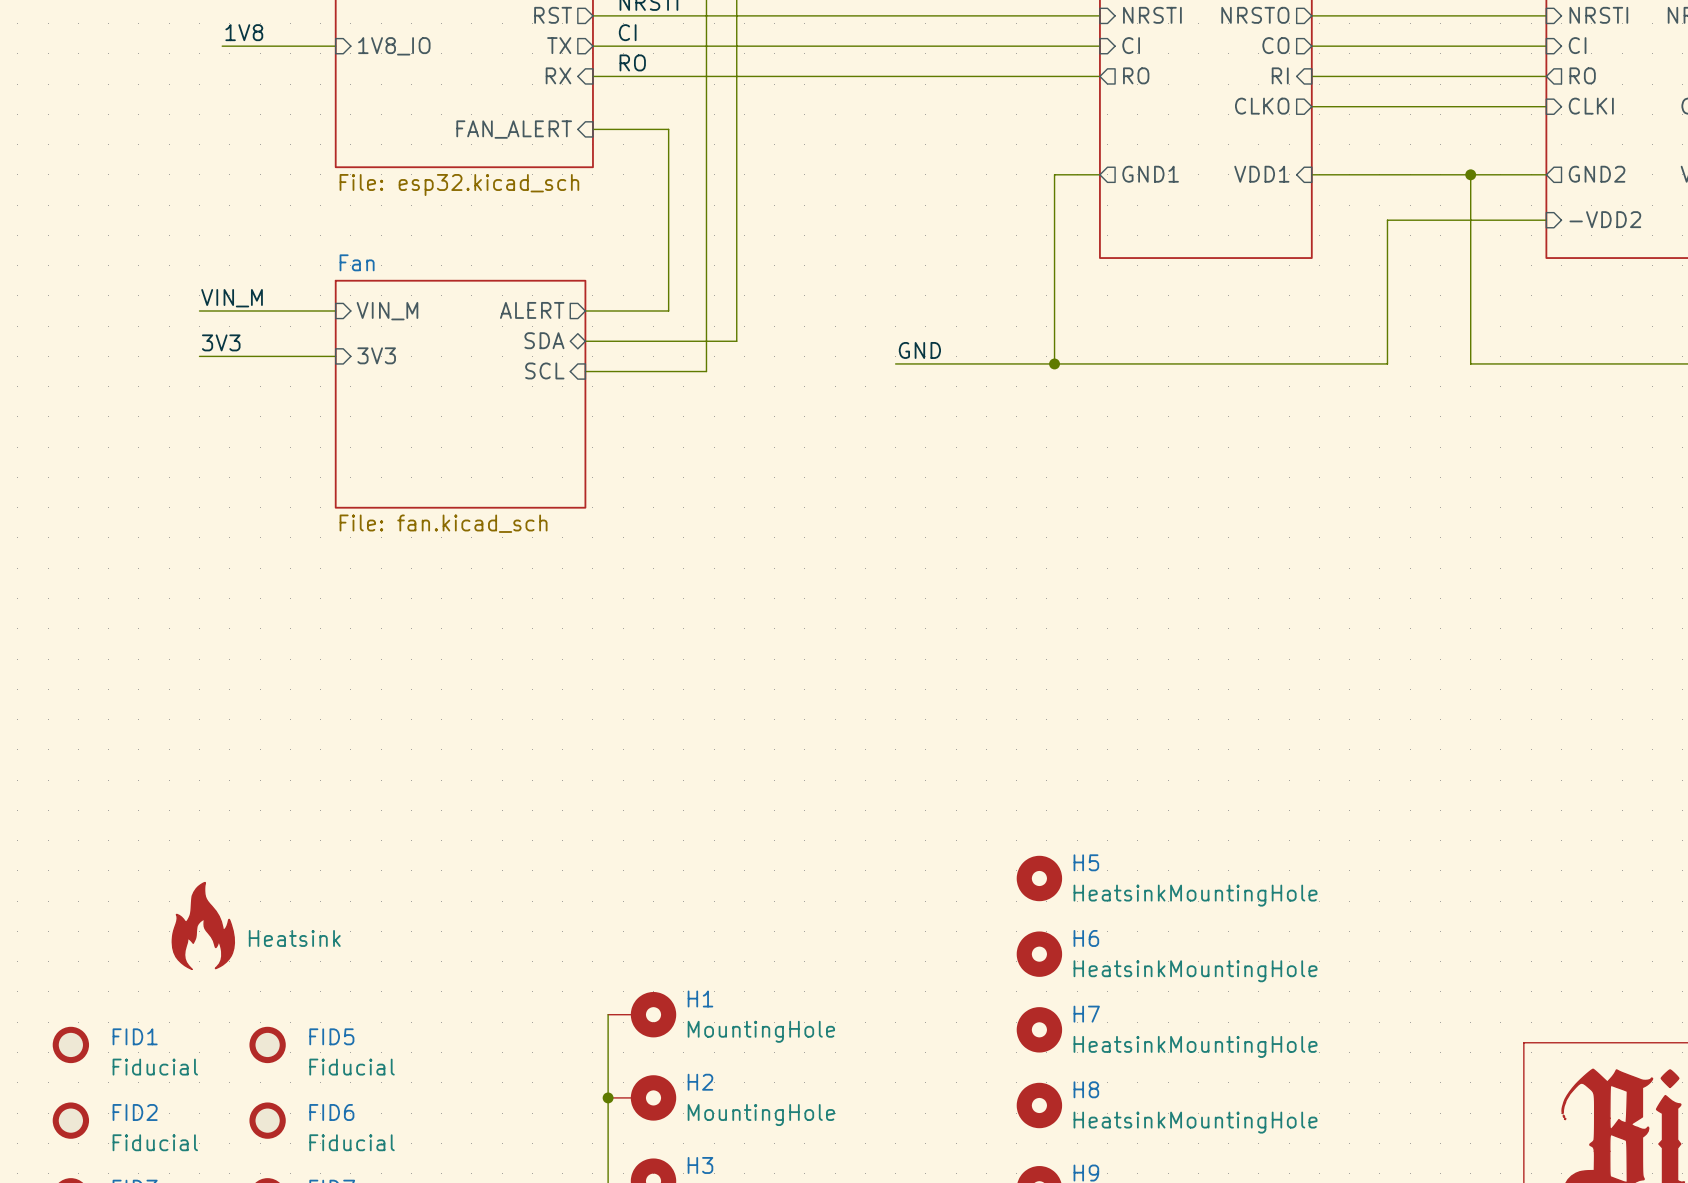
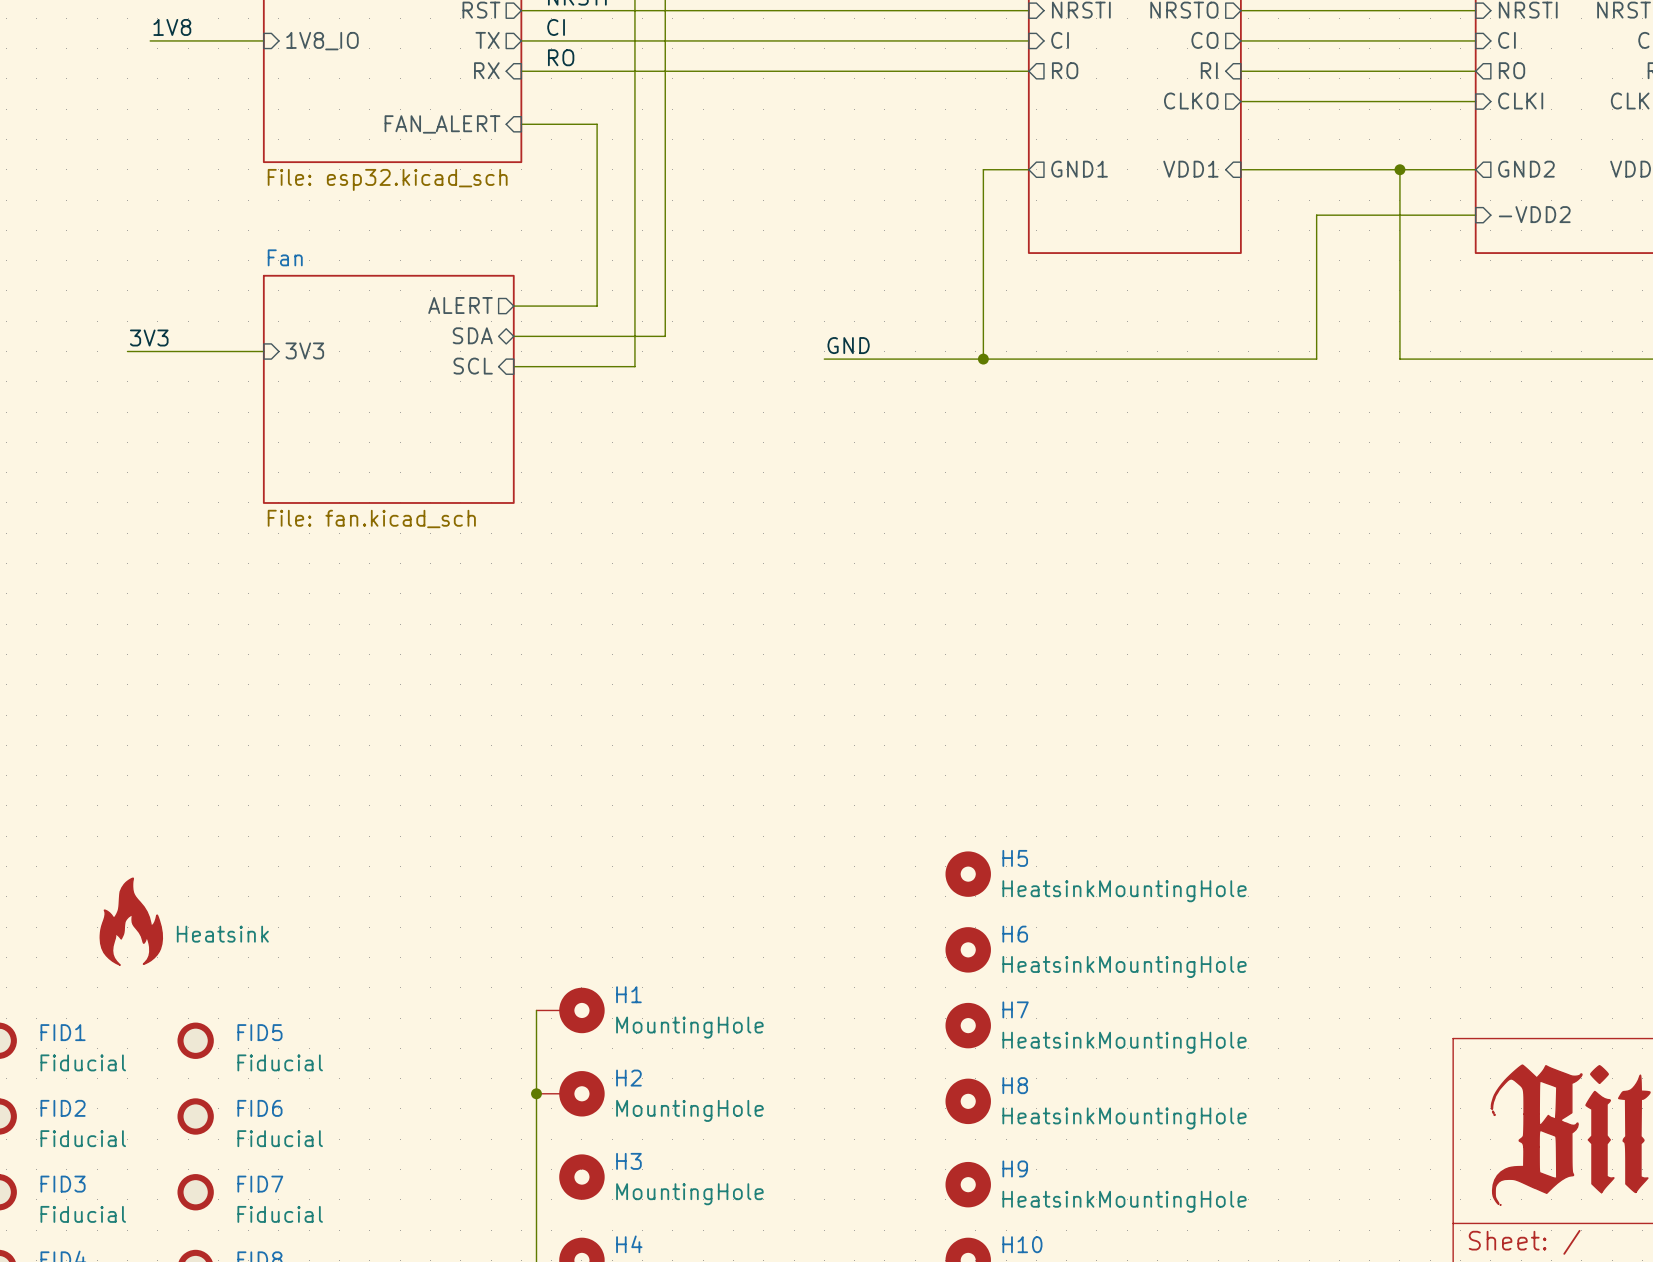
label: VIN_M (232, 298) -> none
wire: (199, 311) (335, 311) -> none
sheet pin: VIN_M (387, 311) -> none

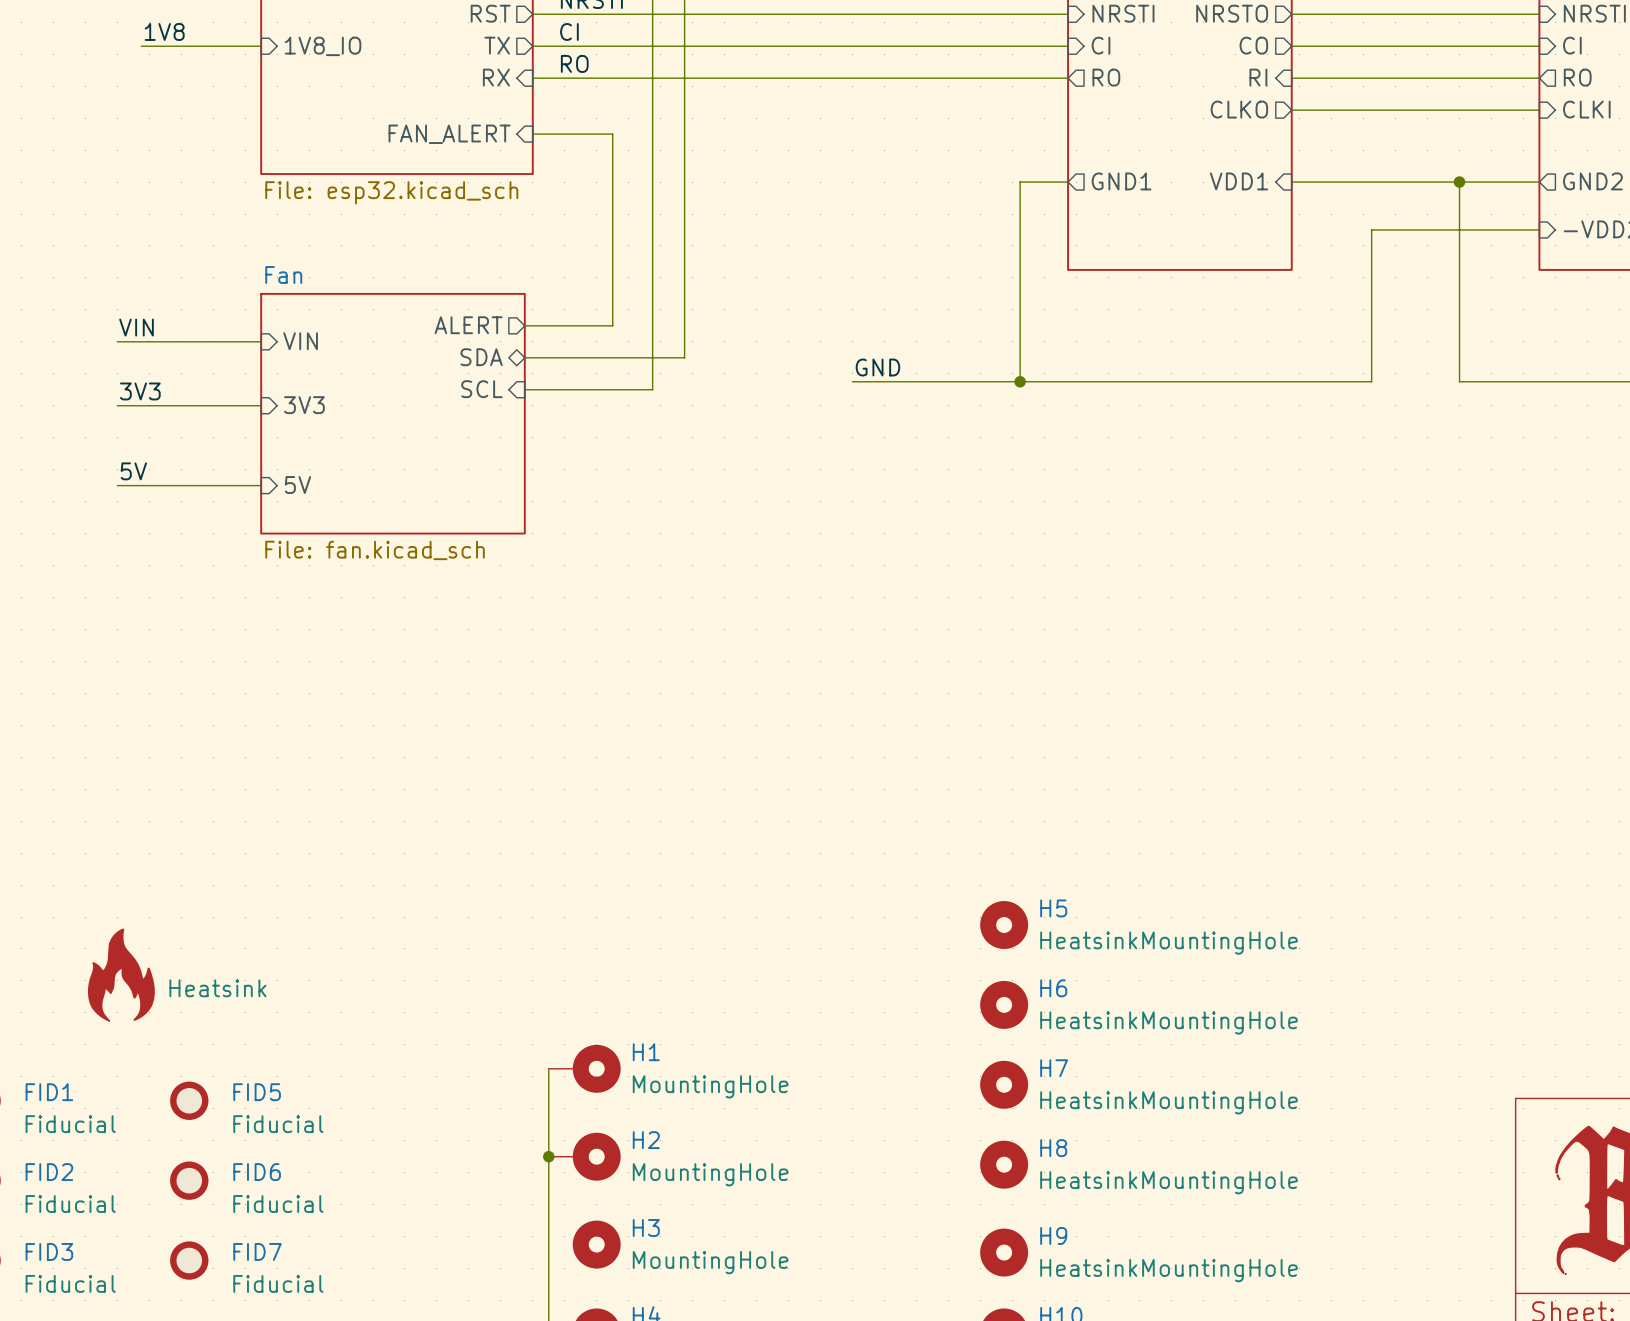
label: none -> VIN (136, 327)
sheet pin: none -> VIN (300, 341)
label position: 3V3 (149, 337) -> 3V3 (140, 391)
sheet pin position: 3V3 (304, 350) -> 3V3 (304, 405)
wire: (127, 351) (263, 351) -> (117, 341) (261, 341)
wire: none -> (117, 405) (261, 405)
label: none -> 5V (133, 471)
sheet pin: none -> 5V (297, 485)
wire: none -> (117, 485) (261, 485)

